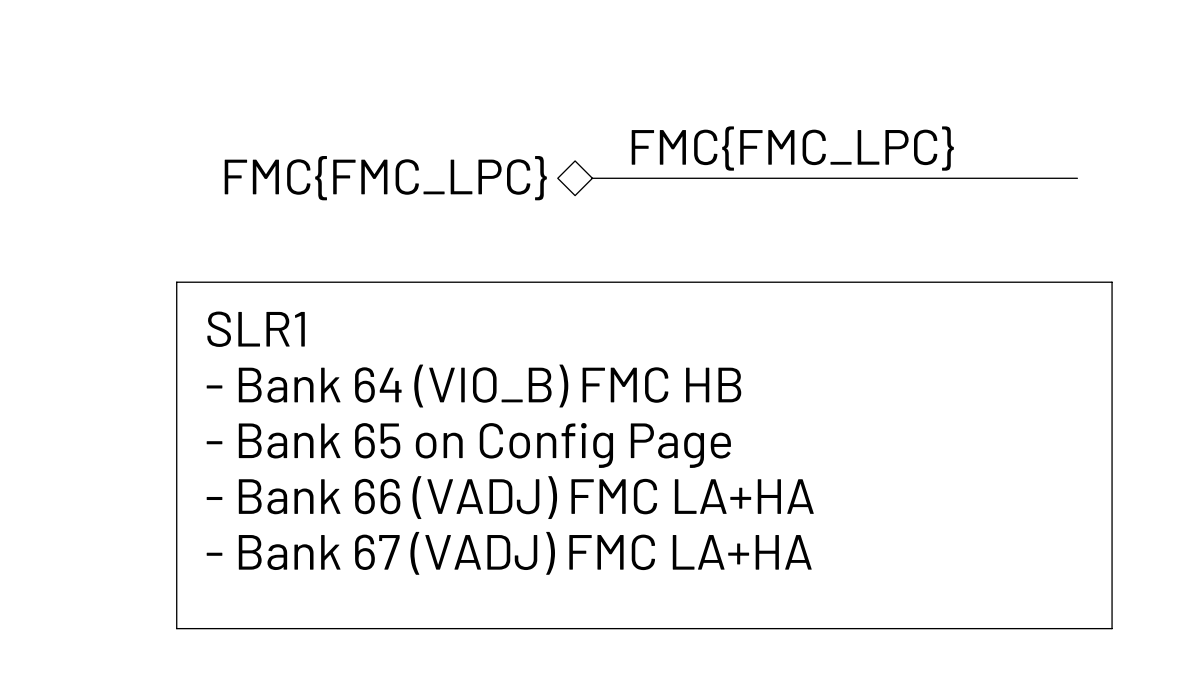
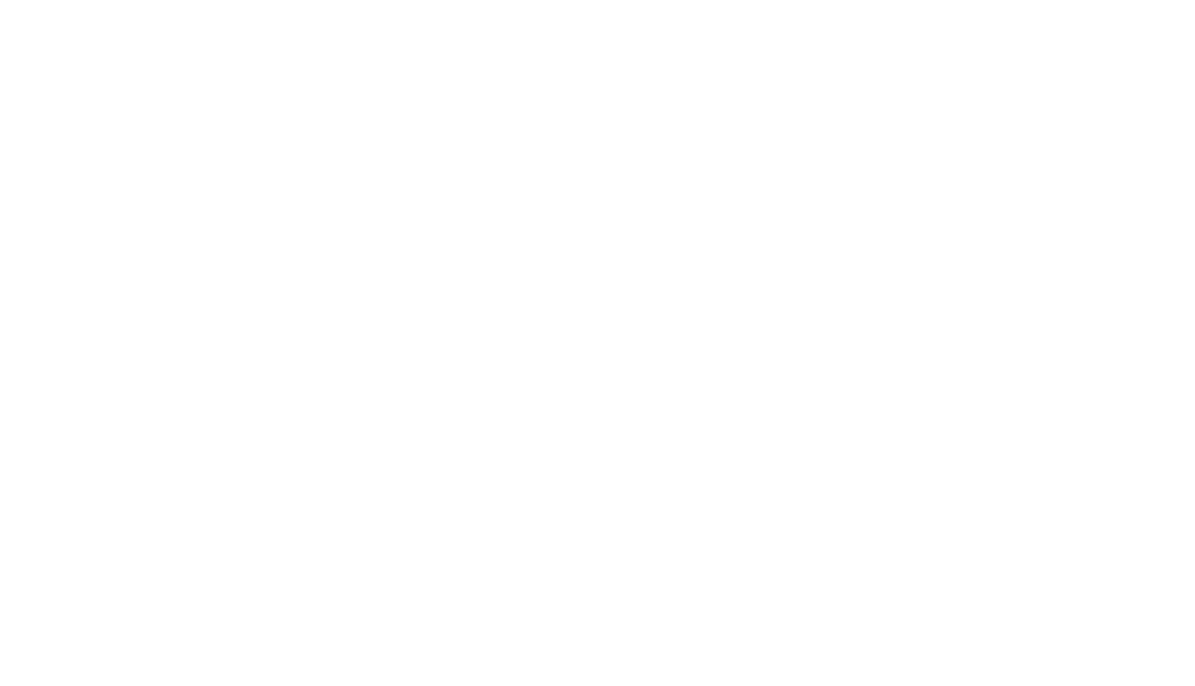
label: FMC{FMC_LPC} (792, 148) -> none
hierarchical label: FMC{FMC_LPC} (385, 178) -> none
bus: (592, 178) (1077, 178) -> none
line: (176, 282) (1112, 282) (1112, 628) (176, 628) (176, 282) -> none
text: SLR1 (256, 329) -> none
text: - Bank 64 (VIO_B) FMC HB (473, 386) -> none
text: - Bank 65 on Config Page (468, 445) -> none
text: - Bank 66 (VADJ) FMC LA+HA (510, 497) -> none
text: - Bank 67 (VADJ) FMC LA+HA (509, 553) -> none

